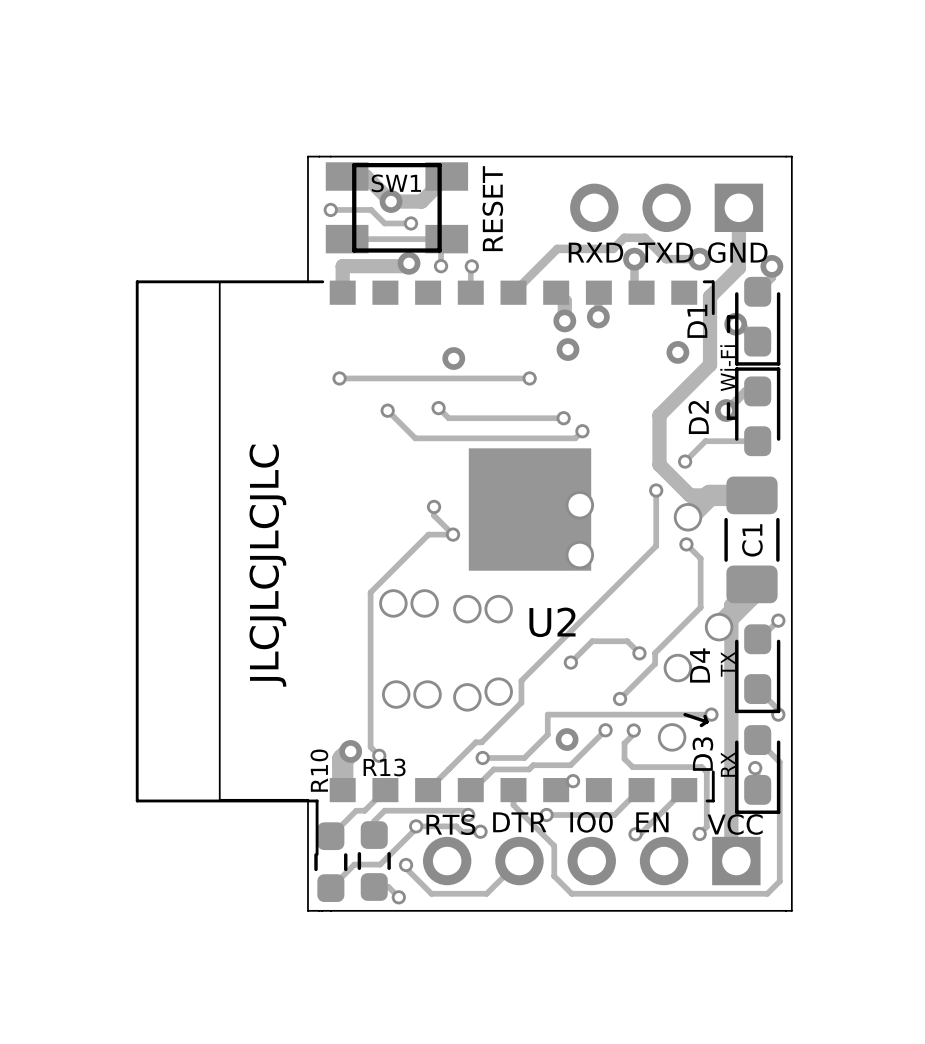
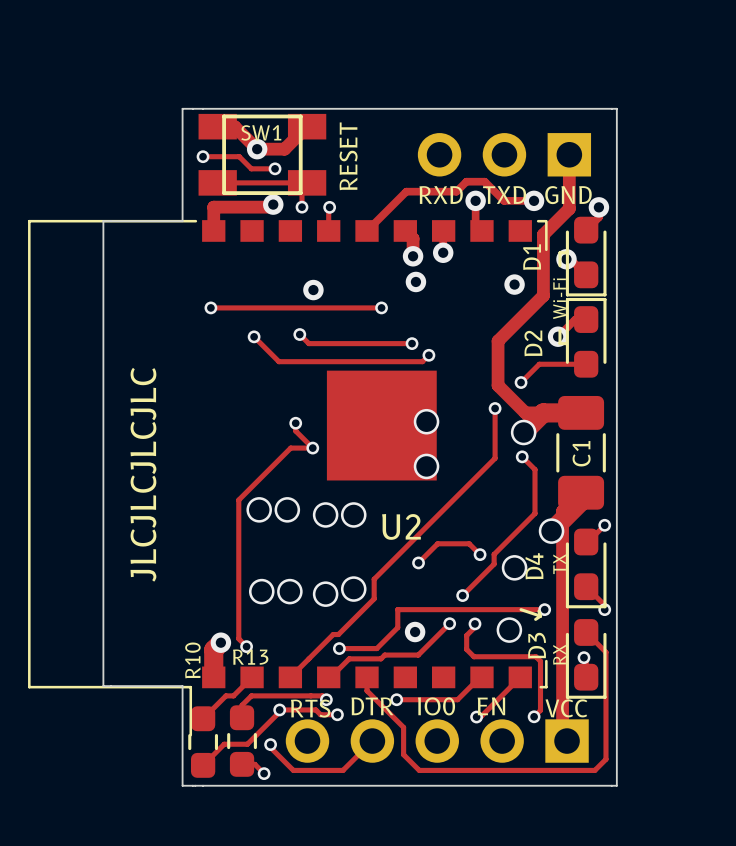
via: (573, 781) -> none

